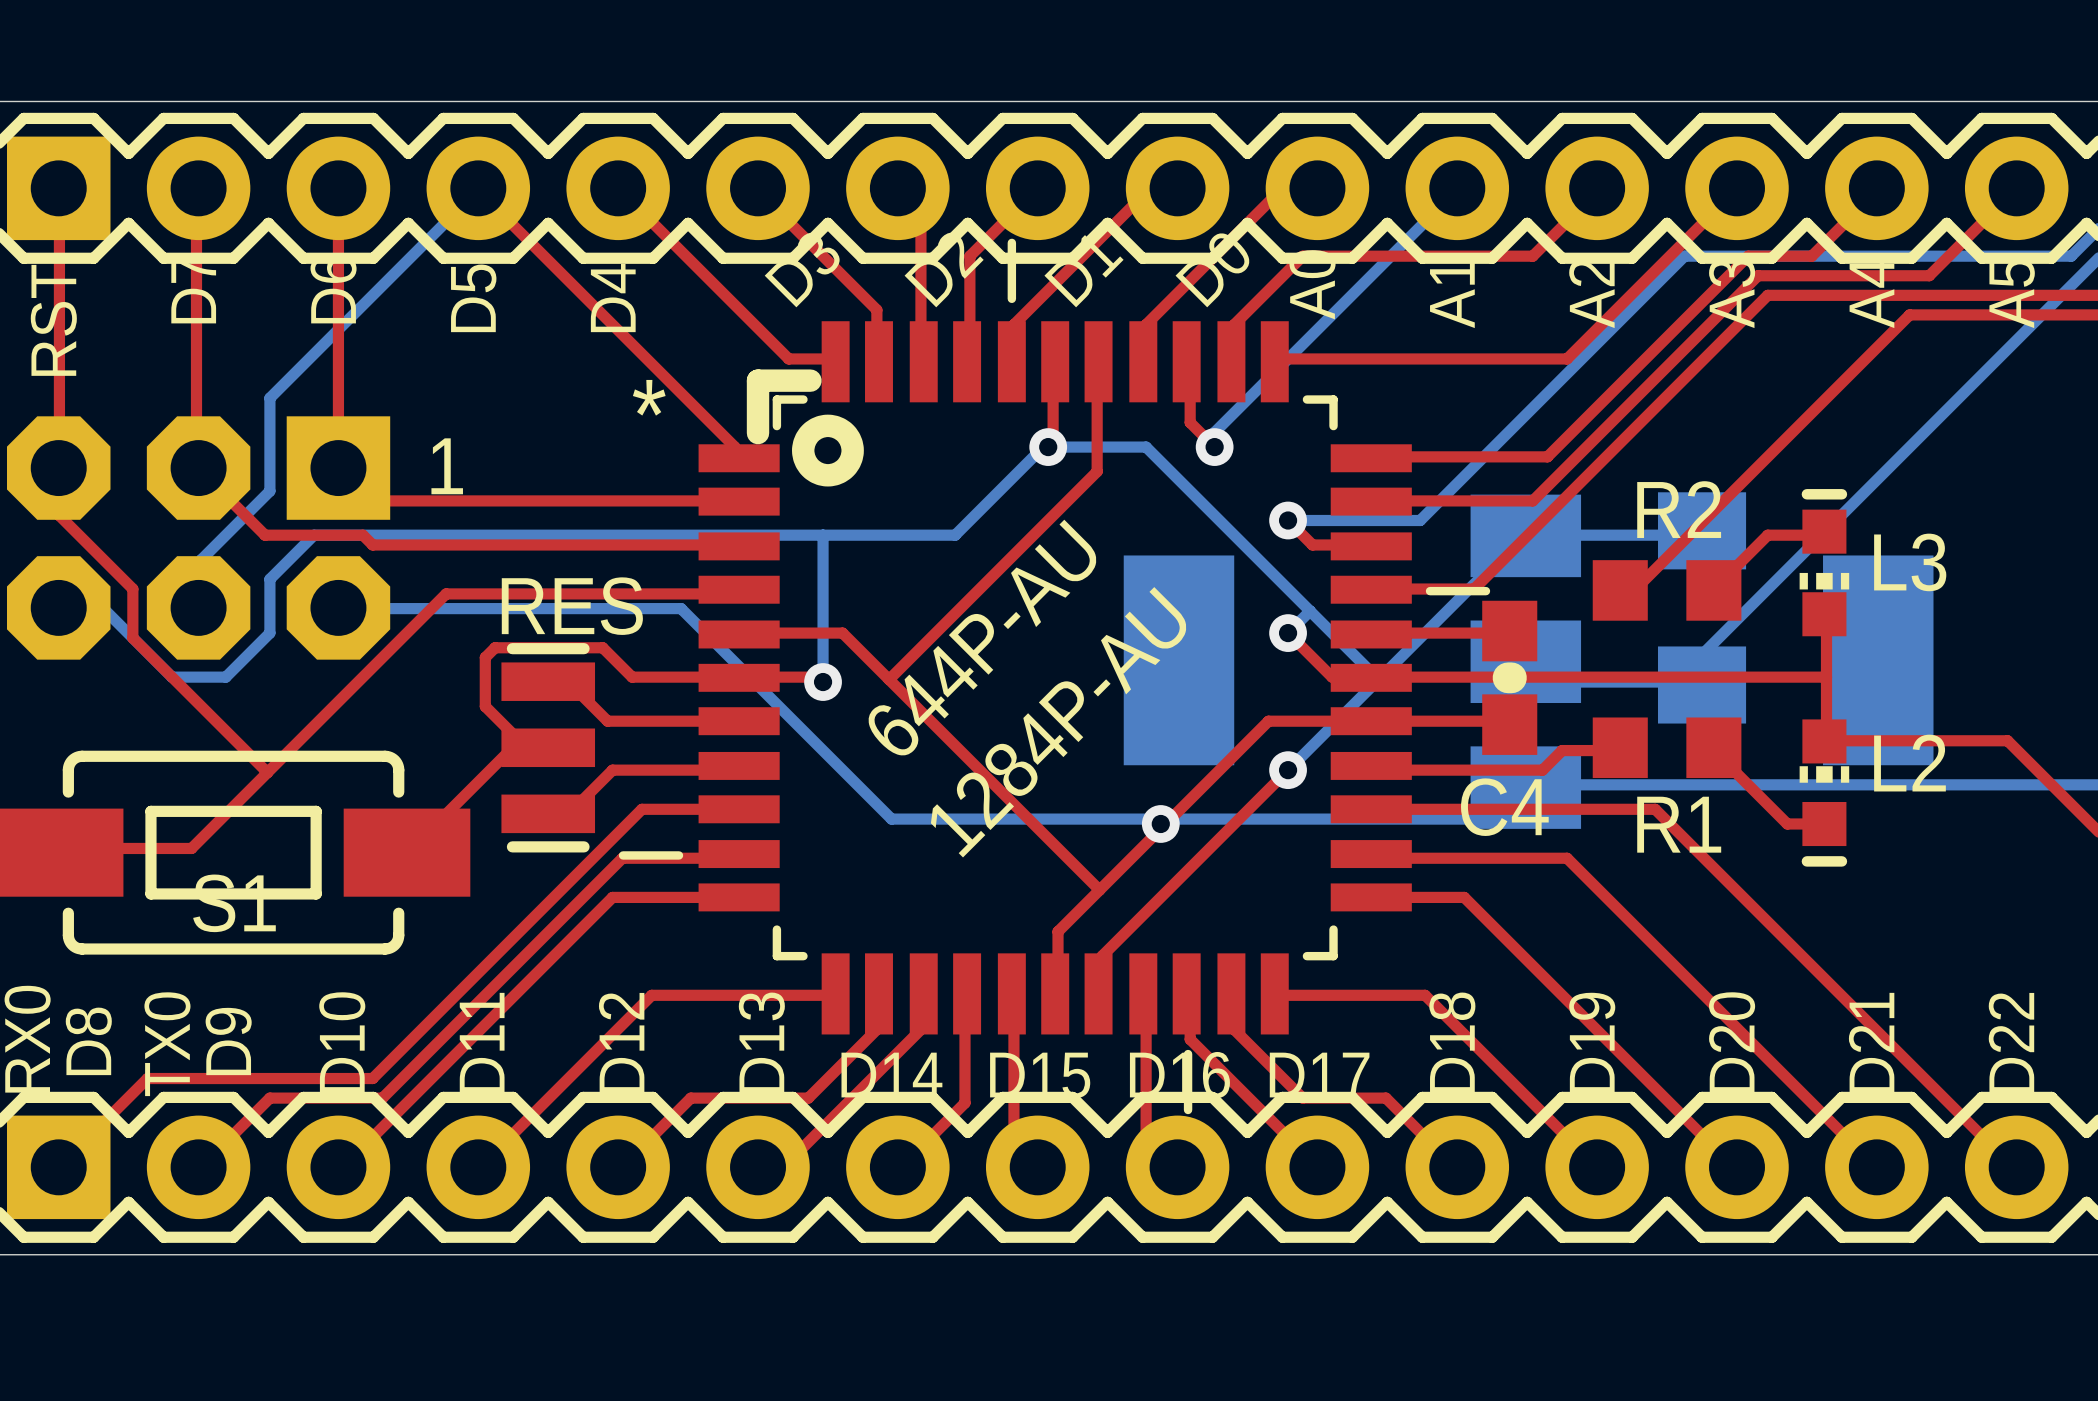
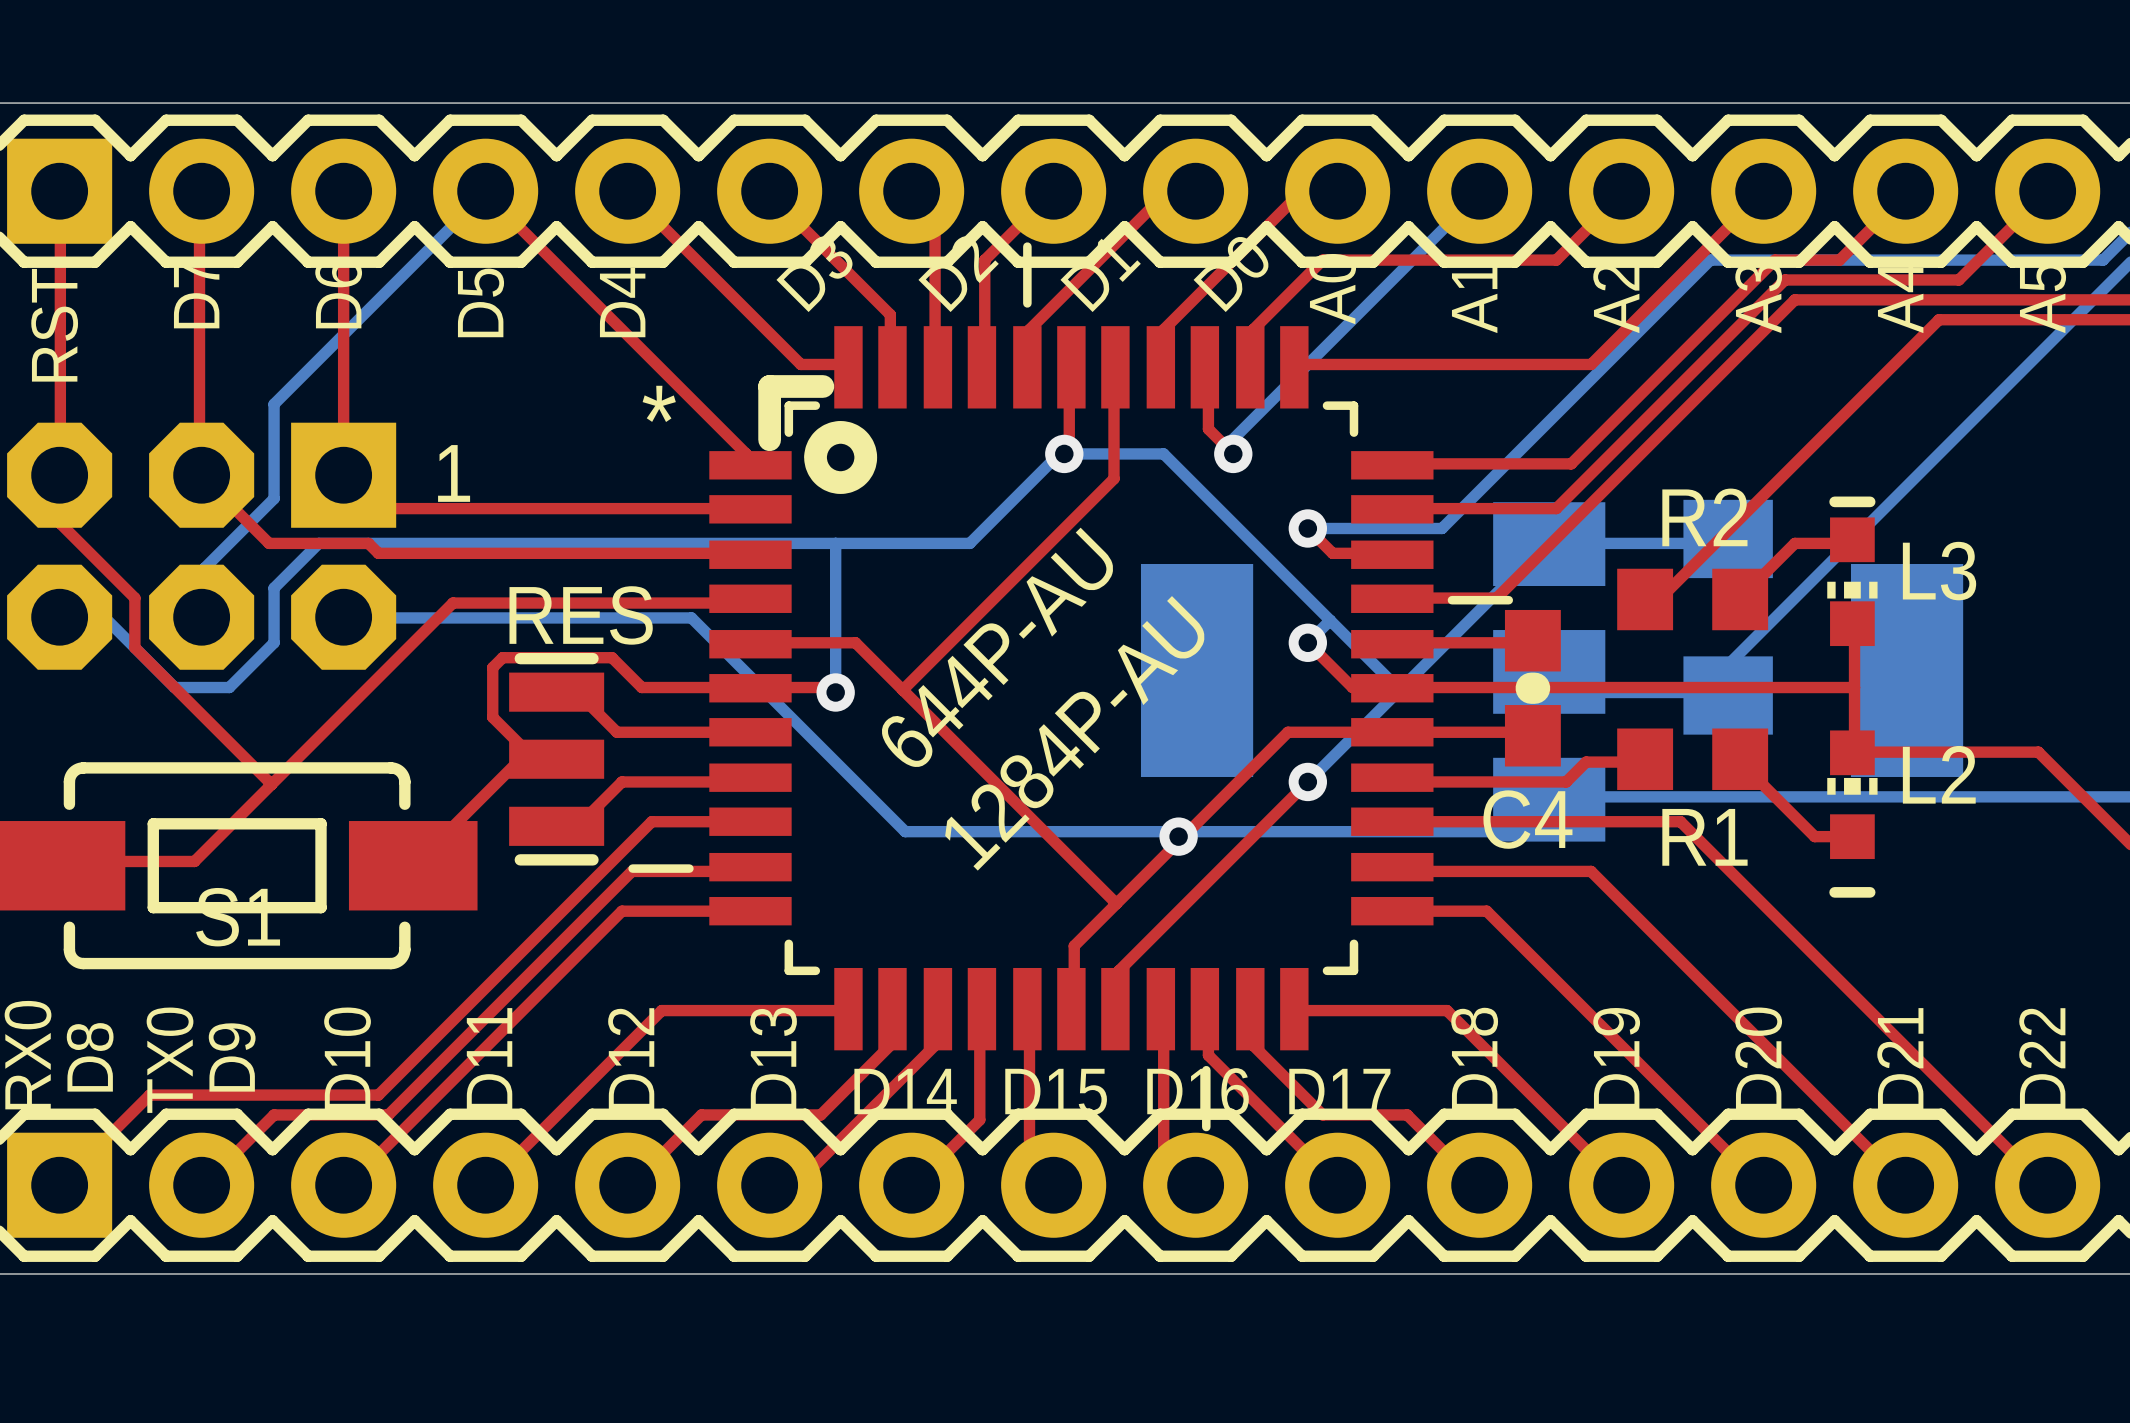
line: (1806, 861) (1841, 861) -> (1834, 892) (1870, 892)

